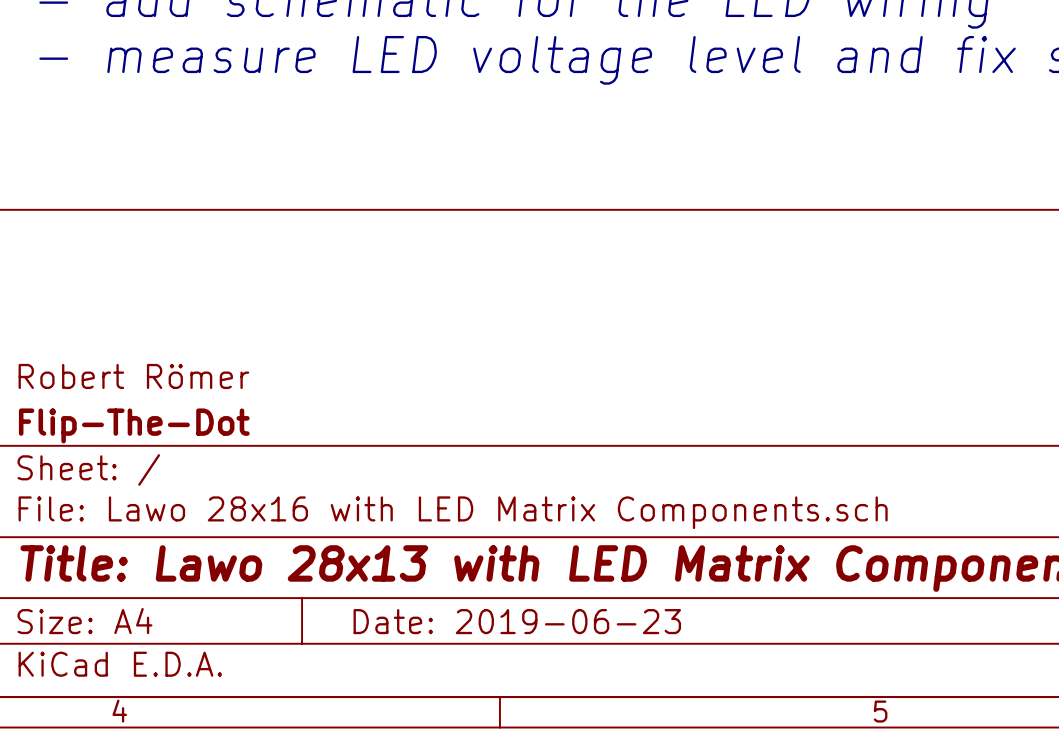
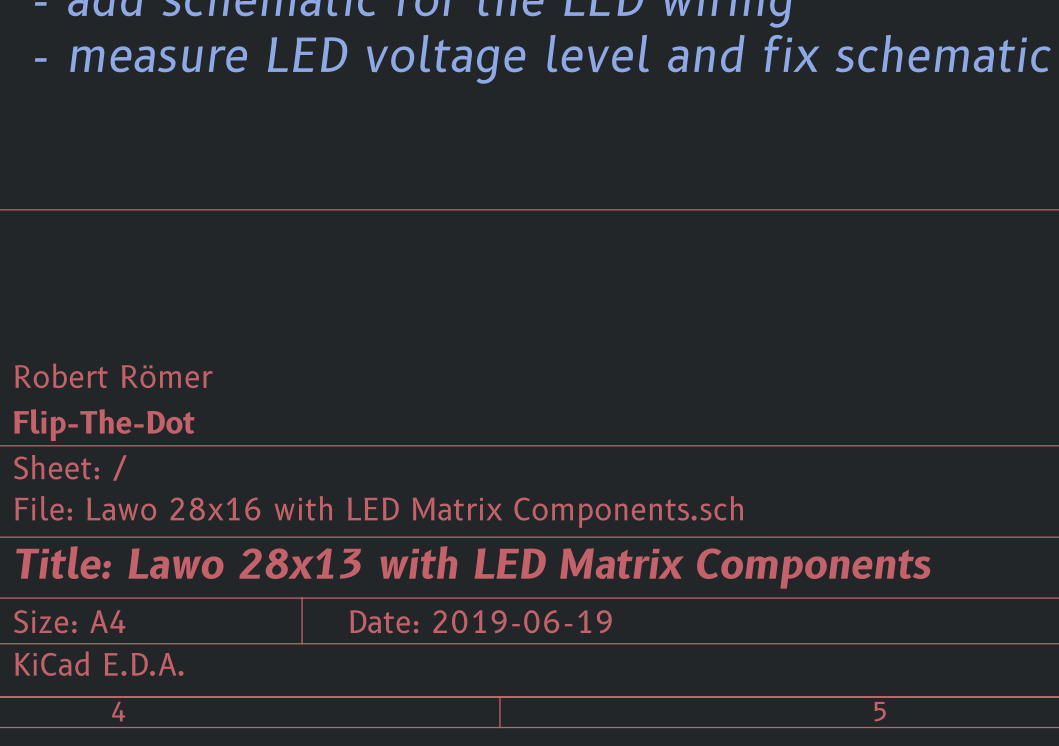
title block: Date: 2019-06-23 (517, 621) -> Date: 2019-06-19 (481, 621)

